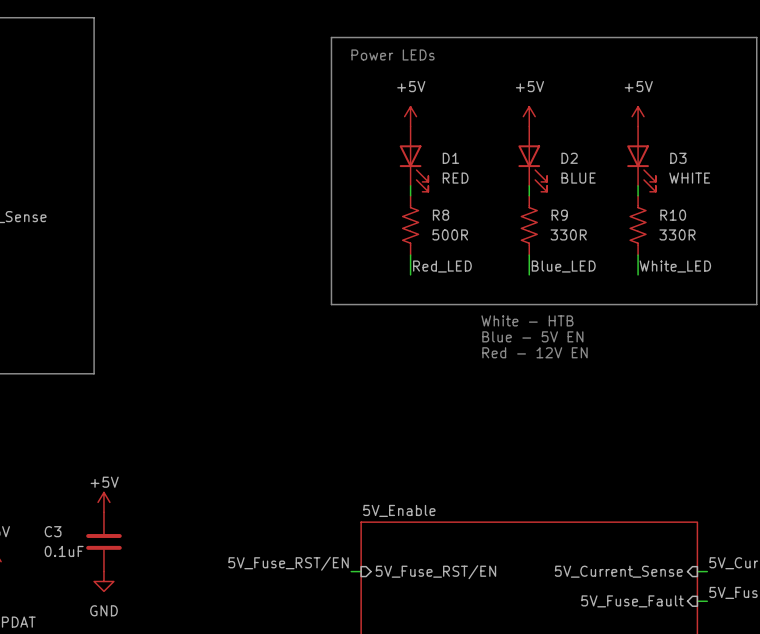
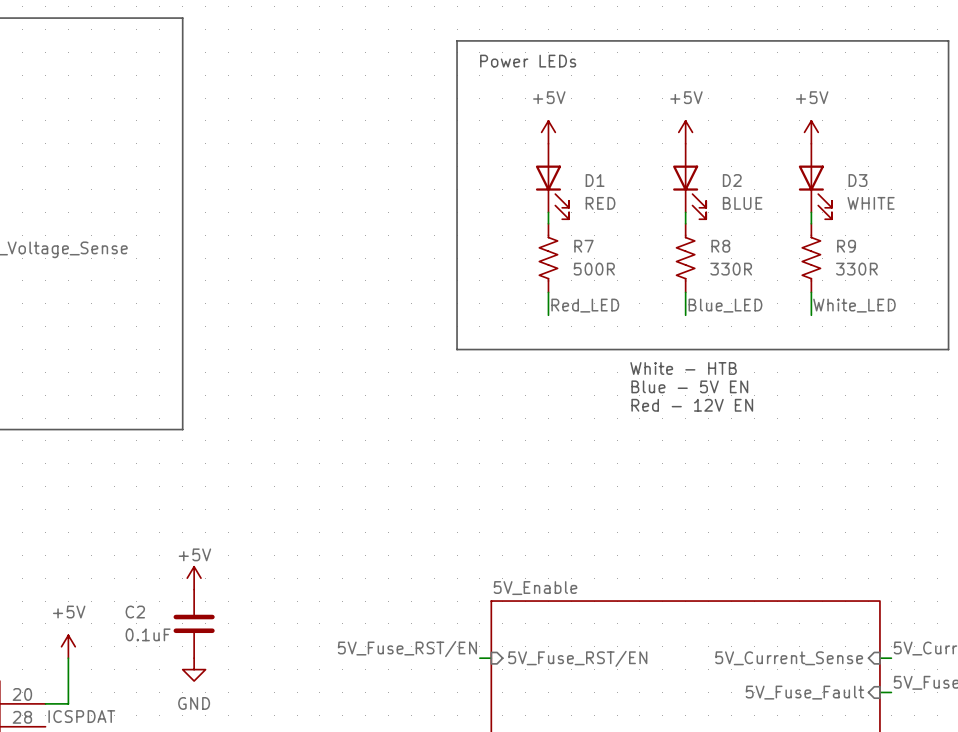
R8 name: R8 (441, 215) -> R7 (583, 246)
R9 name: R9 (559, 215) -> R8 (720, 246)
R10 name: R10 (673, 215) -> R9 (846, 246)
C3 name: C3 (53, 531) -> C2 (135, 612)

